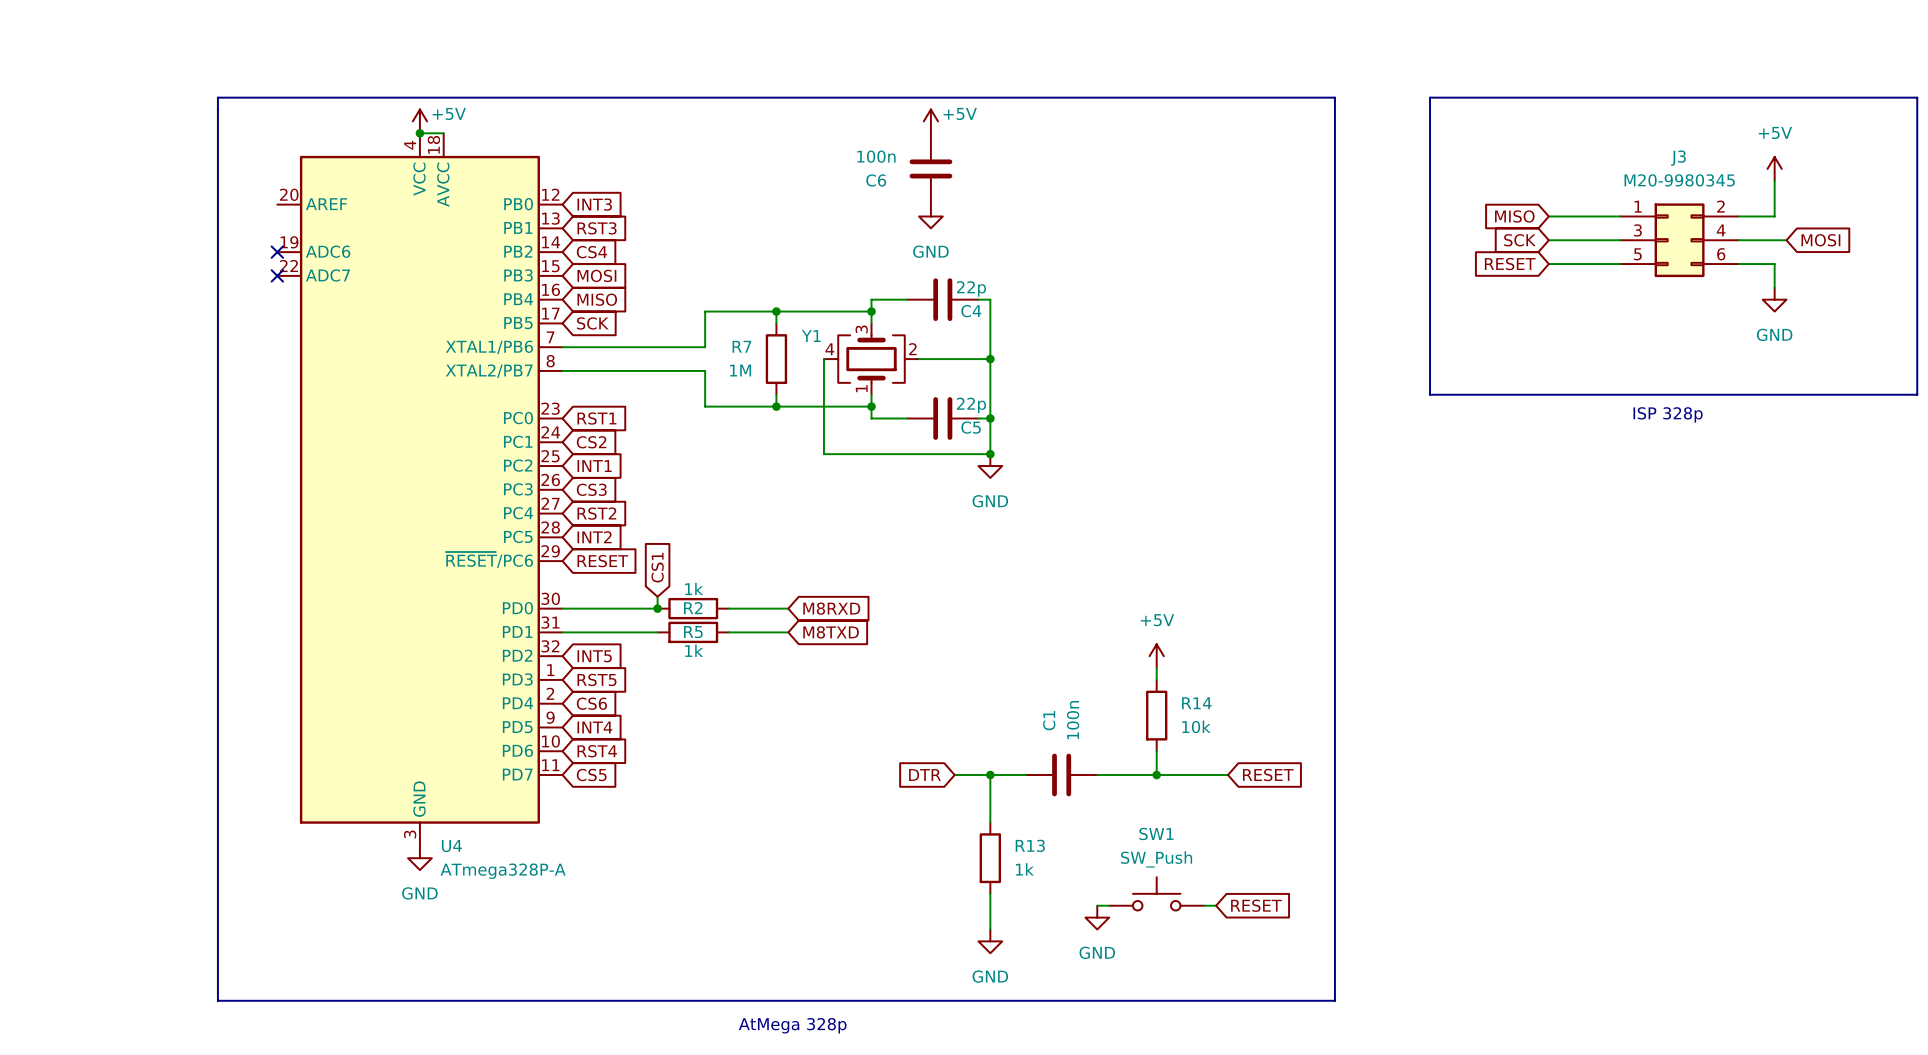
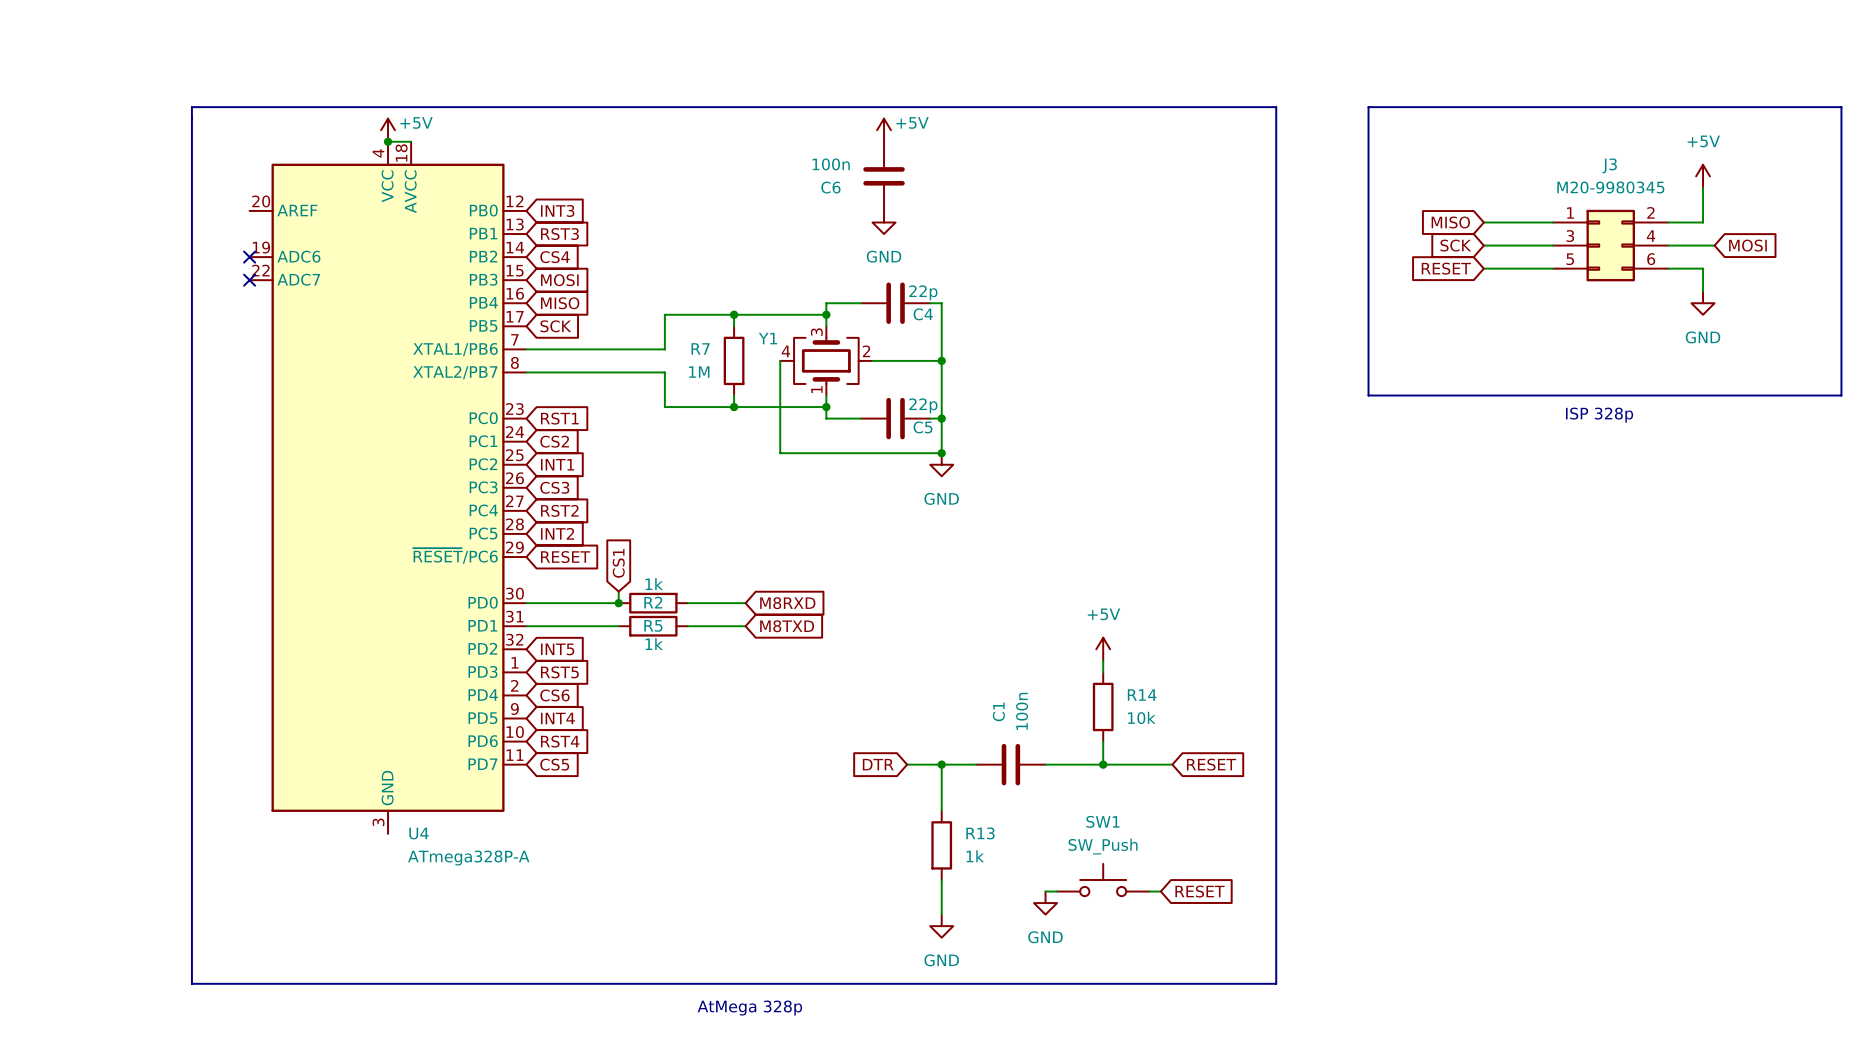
power symbol: GND (419, 858) -> none

